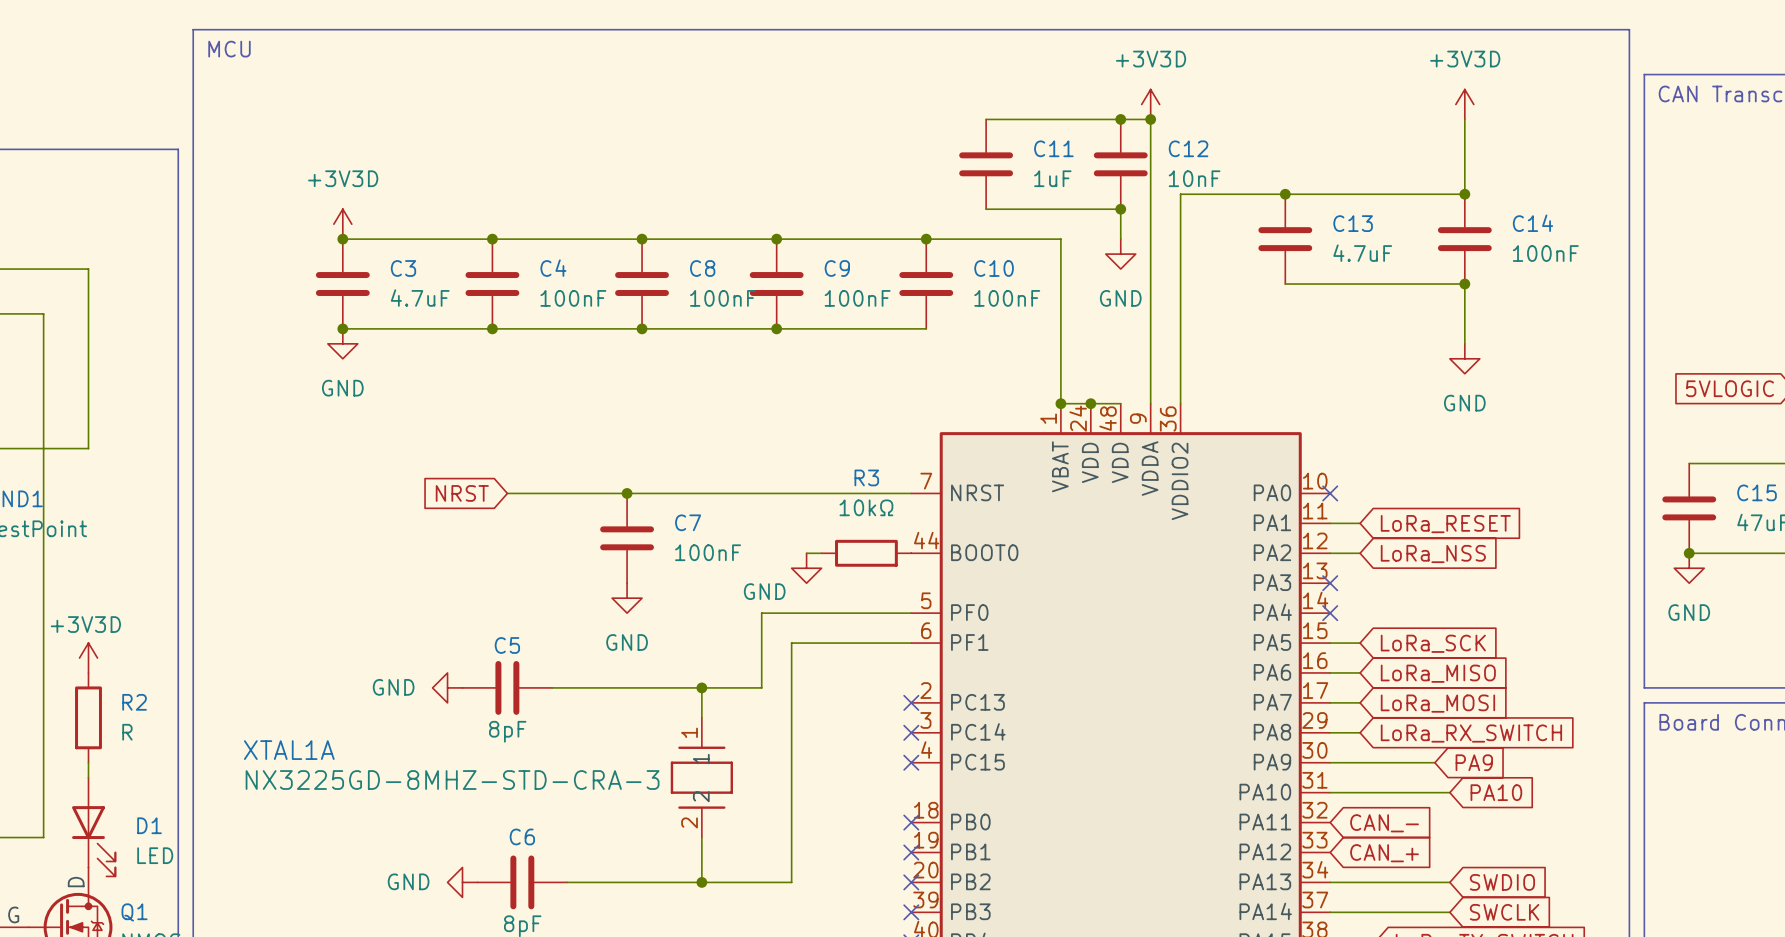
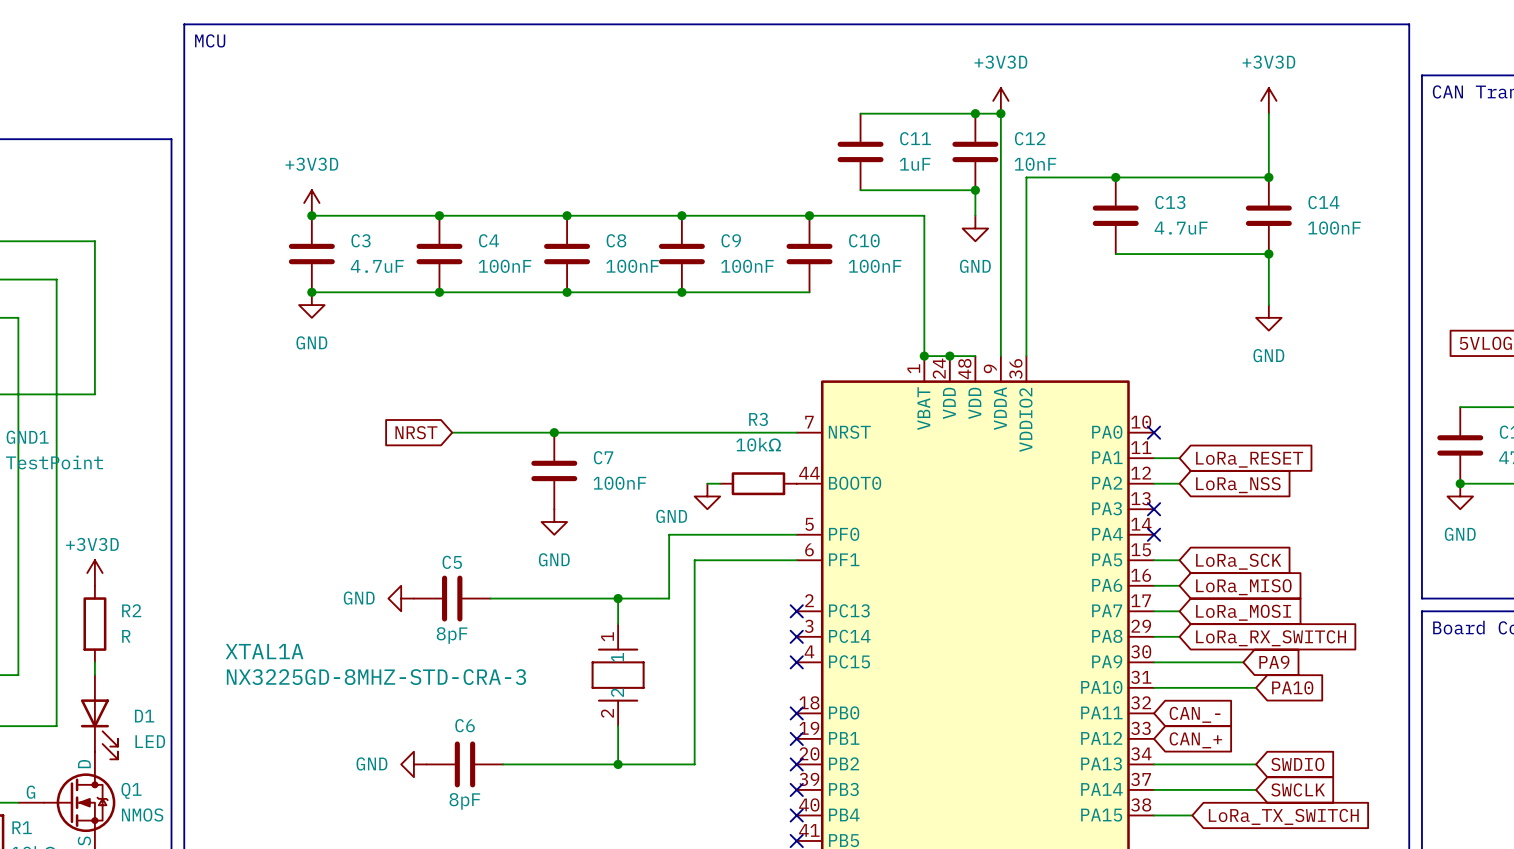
line: (193, 29) (1629, 29) -> (184, 37) (184, 24) (1409, 24) (1409, 37)
text position: MCU (229, 49) -> MCU (210, 40)

